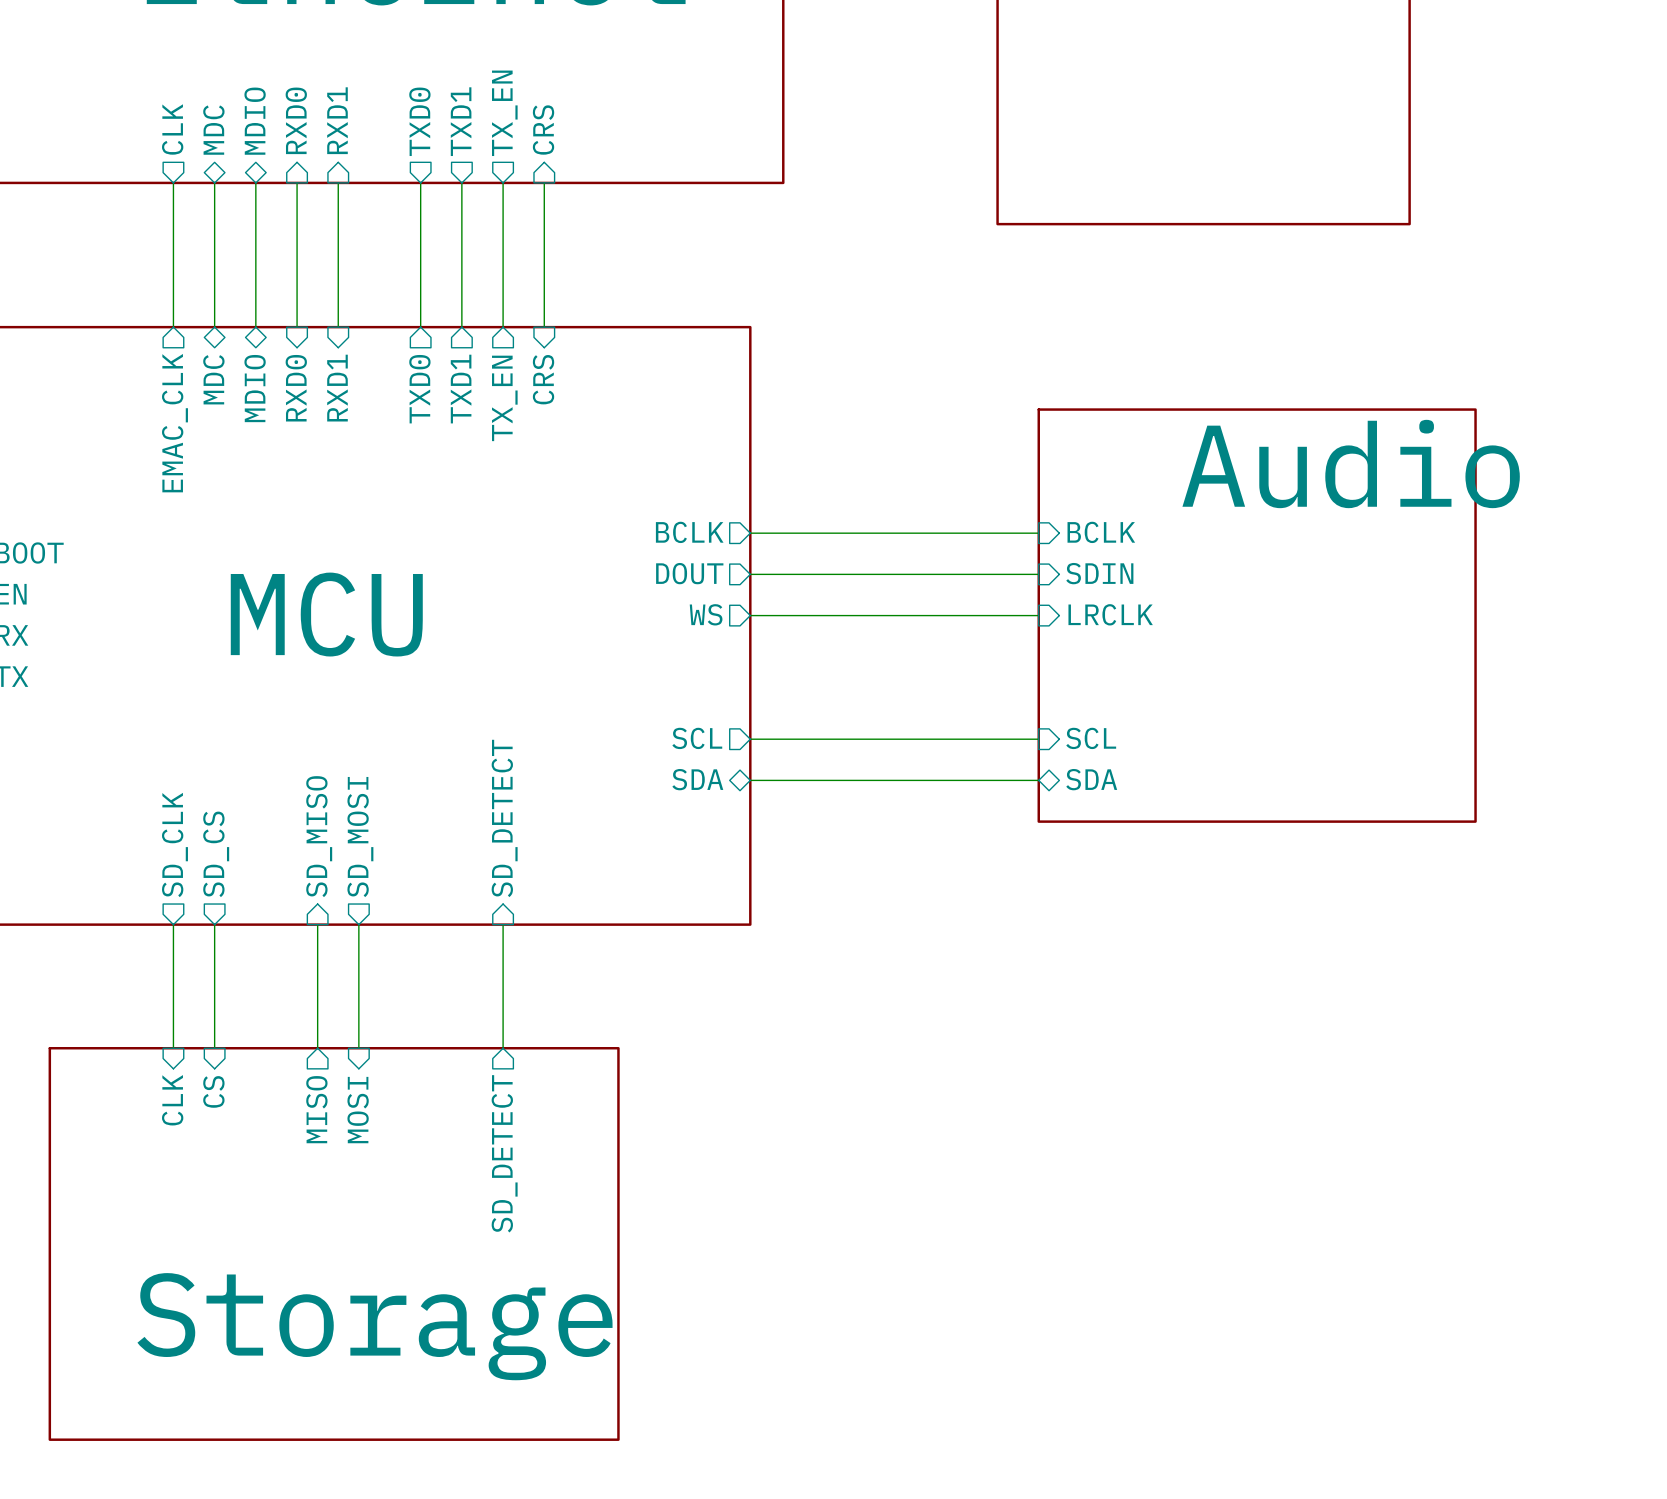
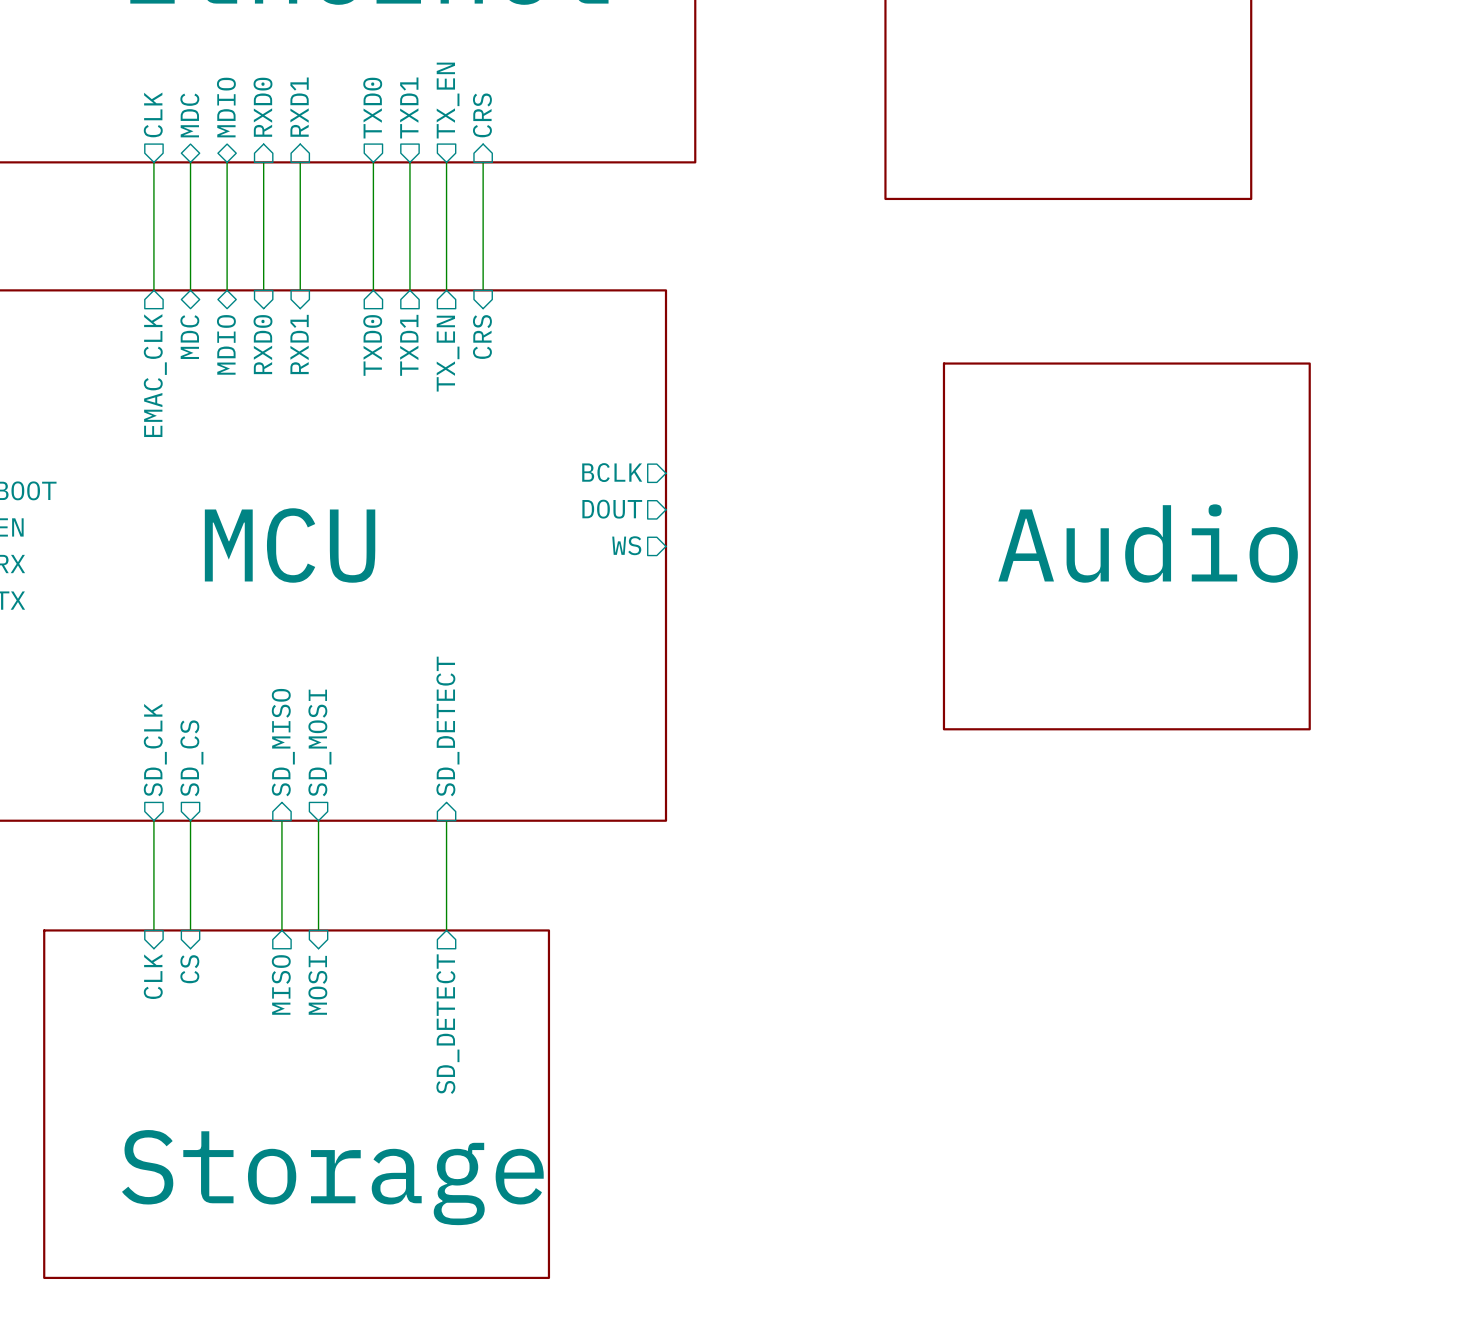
sheet Audio shape: [1037, 408, 1477, 823] -> [942, 362, 1311, 731]
sheet Audio name position: Audio (1351, 464) -> Audio (1148, 543)
sheet pin: BCLK (1101, 532) -> none
wire: (750, 533) (1038, 533) -> none
sheet pin: SDIN (1099, 573) -> none
wire: (750, 574) (1038, 574) -> none
sheet pin: LRCLK (1110, 614) -> none
wire: (750, 615) (1038, 615) -> none
sheet pin: SCL (697, 738) -> none
sheet pin: SCL (1091, 738) -> none
wire: (750, 739) (1038, 739) -> none
sheet pin: SDA (697, 779) -> none
sheet pin: SDA (1091, 779) -> none
wire: (750, 780) (1038, 780) -> none

